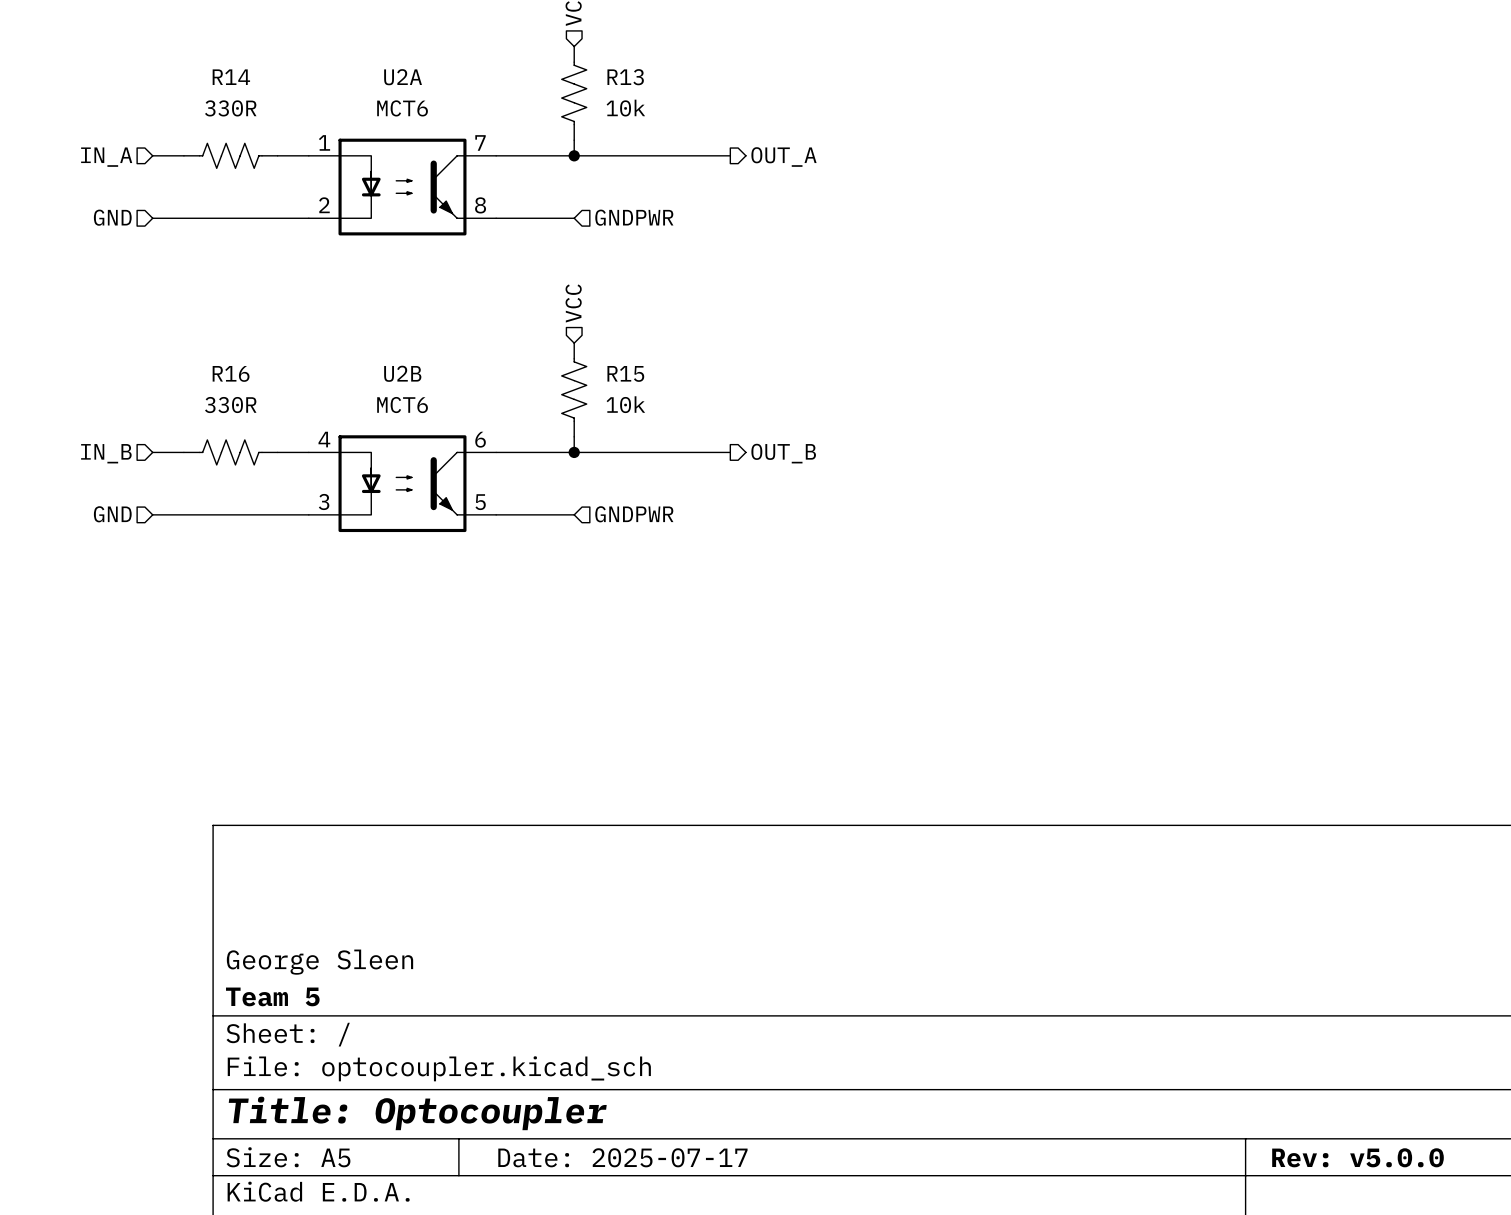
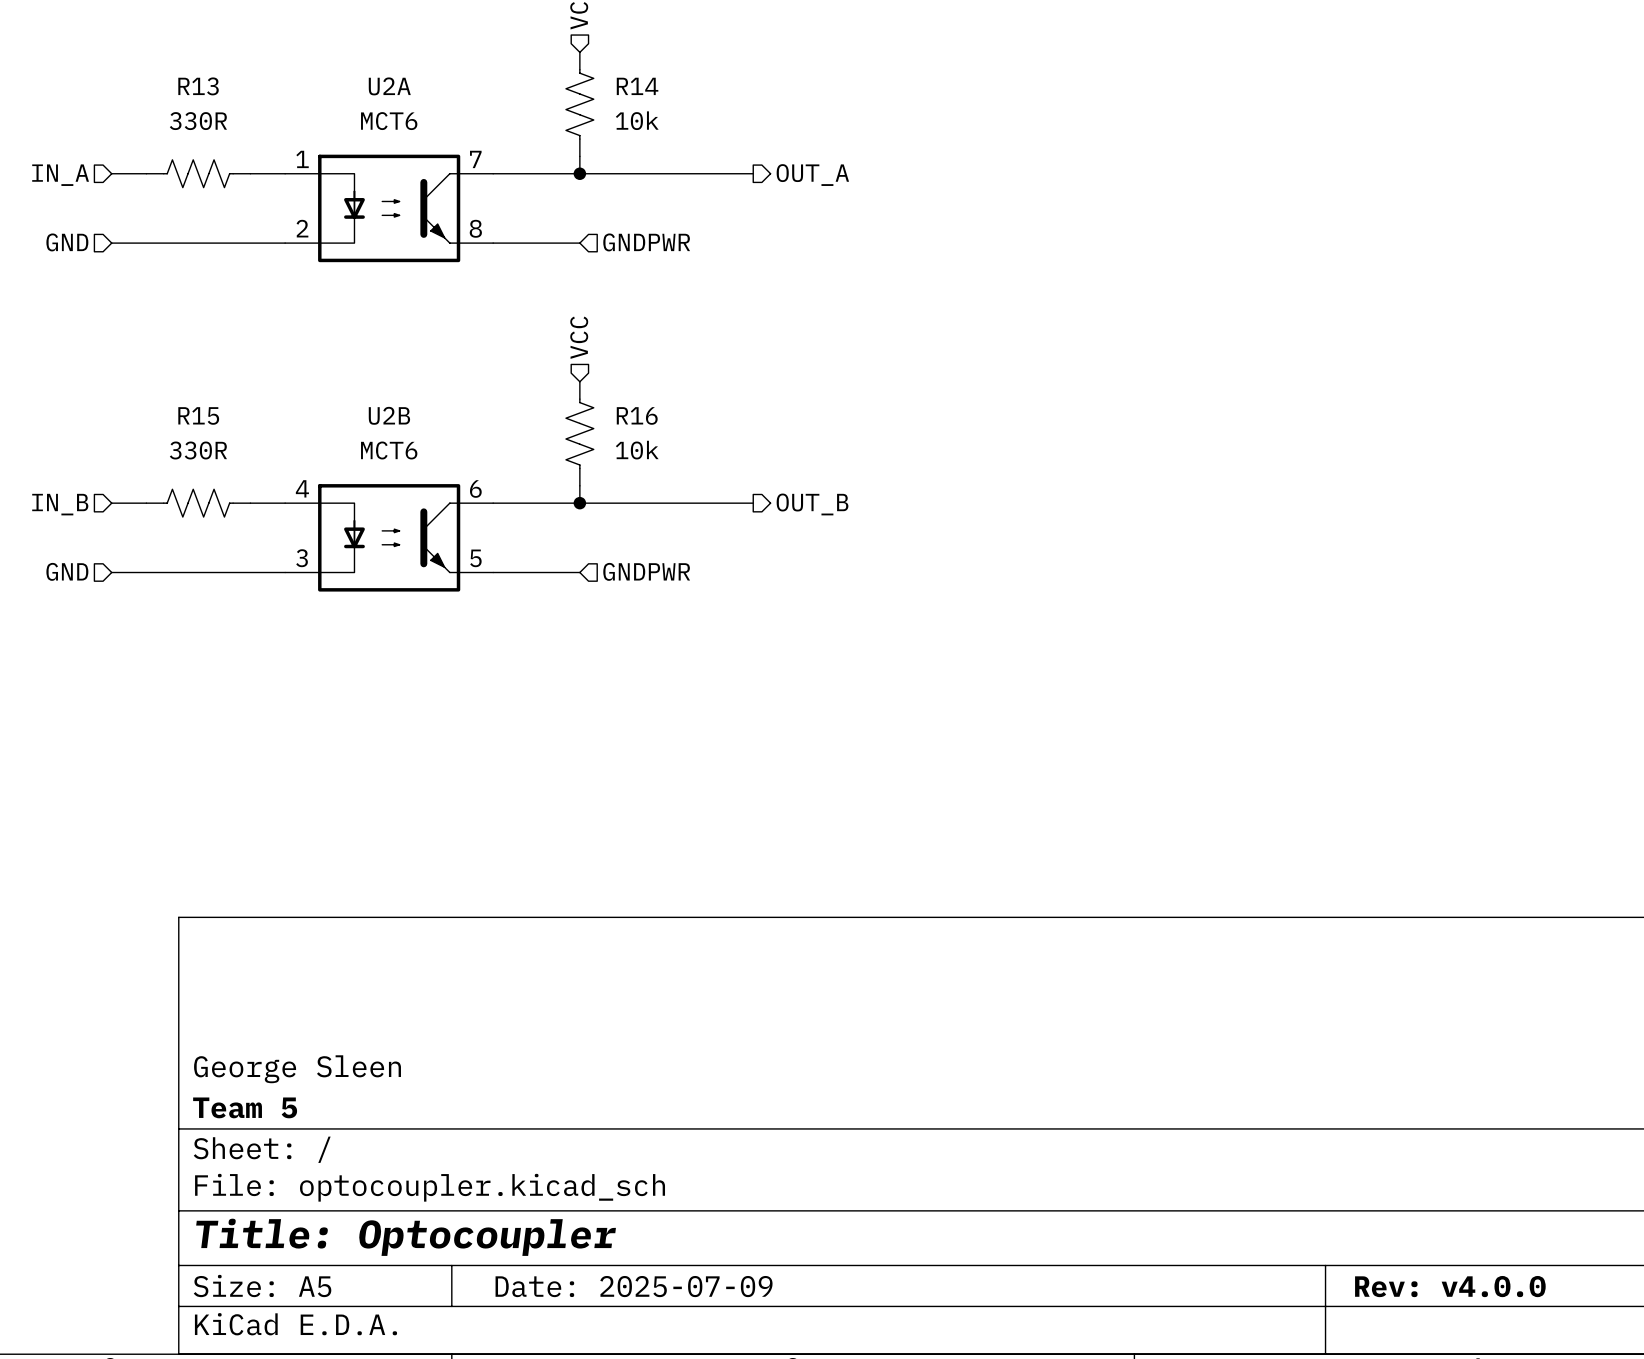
R14 name: R14 (231, 77) -> R13 (198, 86)
R13 name: R13 (625, 77) -> R14 (637, 86)
R16 name: R16 (231, 373) -> R15 (198, 415)
R15 name: R15 (625, 373) -> R16 (637, 415)
title block: Date: 2025-07-17 (622, 1157) -> Date: 2025-07-09 (634, 1286)
title block: Rev: v5.0.0 (1358, 1157) -> Rev: v4.0.0 (1450, 1286)

